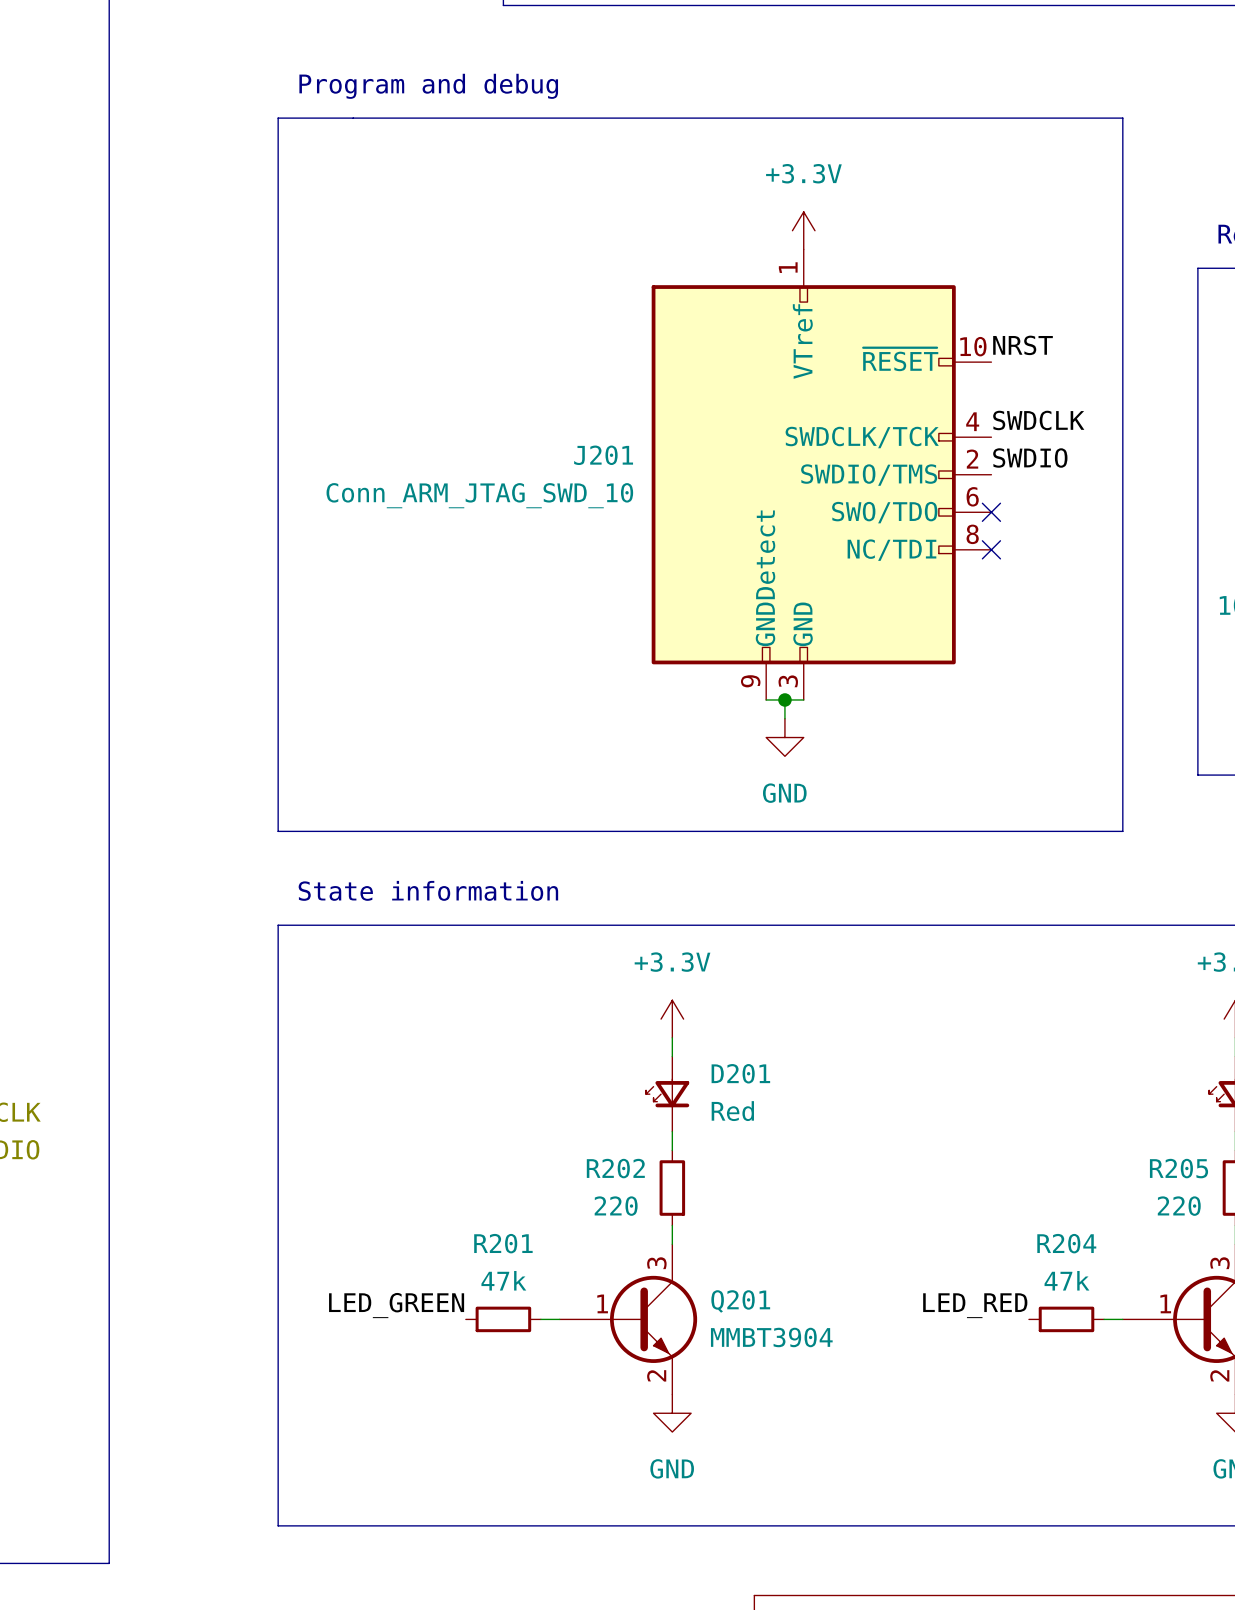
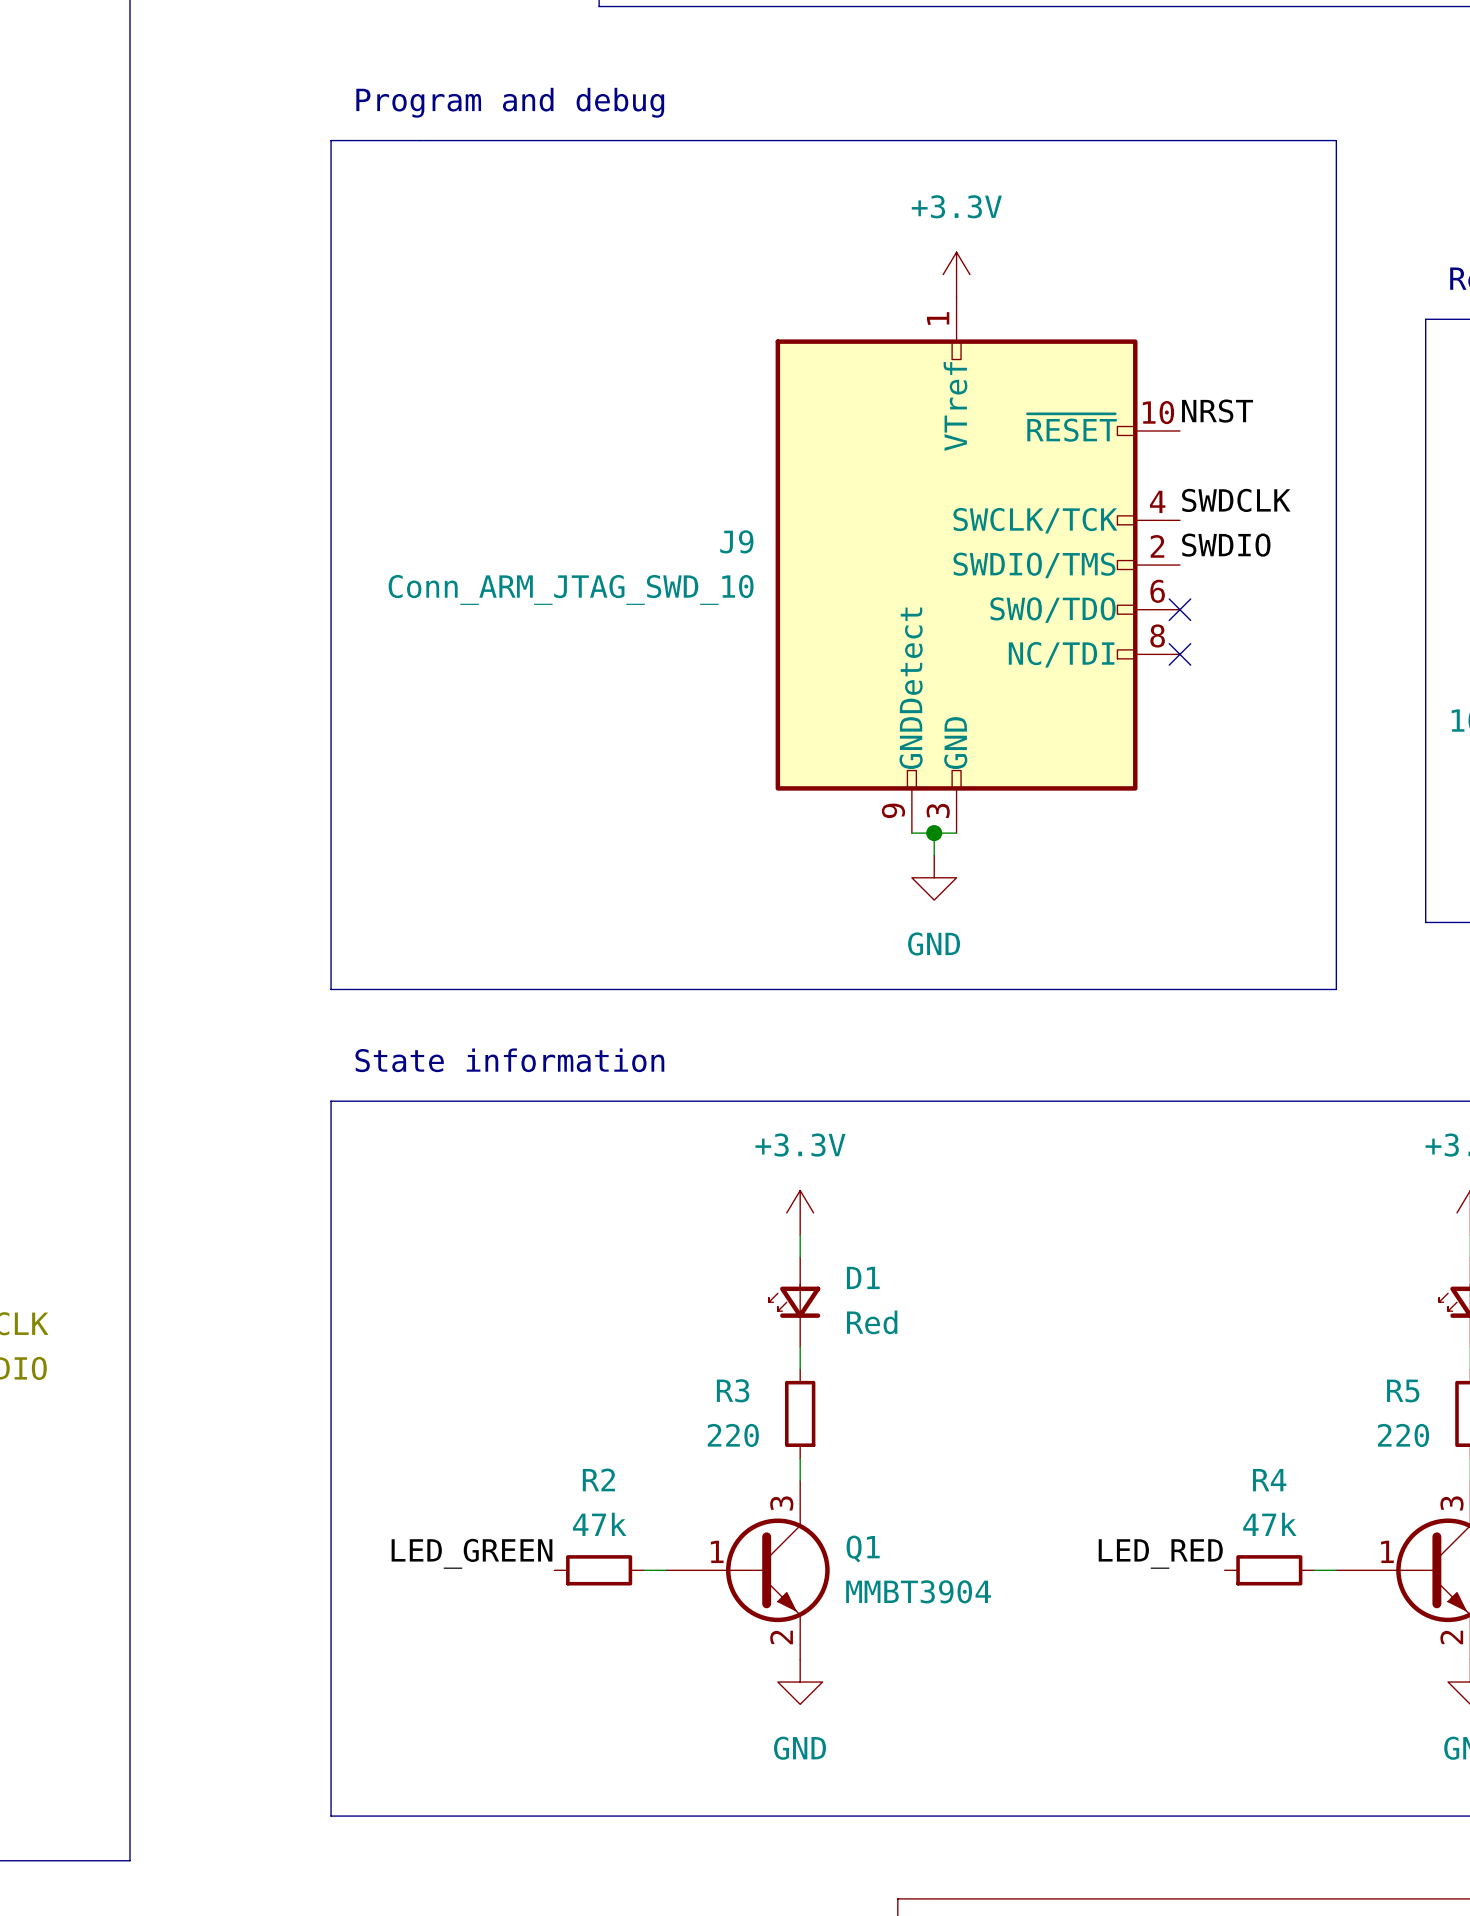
J201 pin name: SWDCLK/TCK (862, 437) -> SWCLK/TCK (1035, 520)
J201 name: J201 (603, 455) -> J9 (736, 541)
D201 name: D201 (740, 1073) -> D1 (863, 1277)
R202 name: R202 (615, 1168) -> R3 (733, 1390)
R205 name: R205 (1179, 1168) -> R5 (1403, 1390)
R201 name: R201 (503, 1243) -> R2 (598, 1479)
R204 name: R204 (1066, 1243) -> R4 (1269, 1480)
Q201 name: Q201 (740, 1301) -> Q1 (863, 1548)

